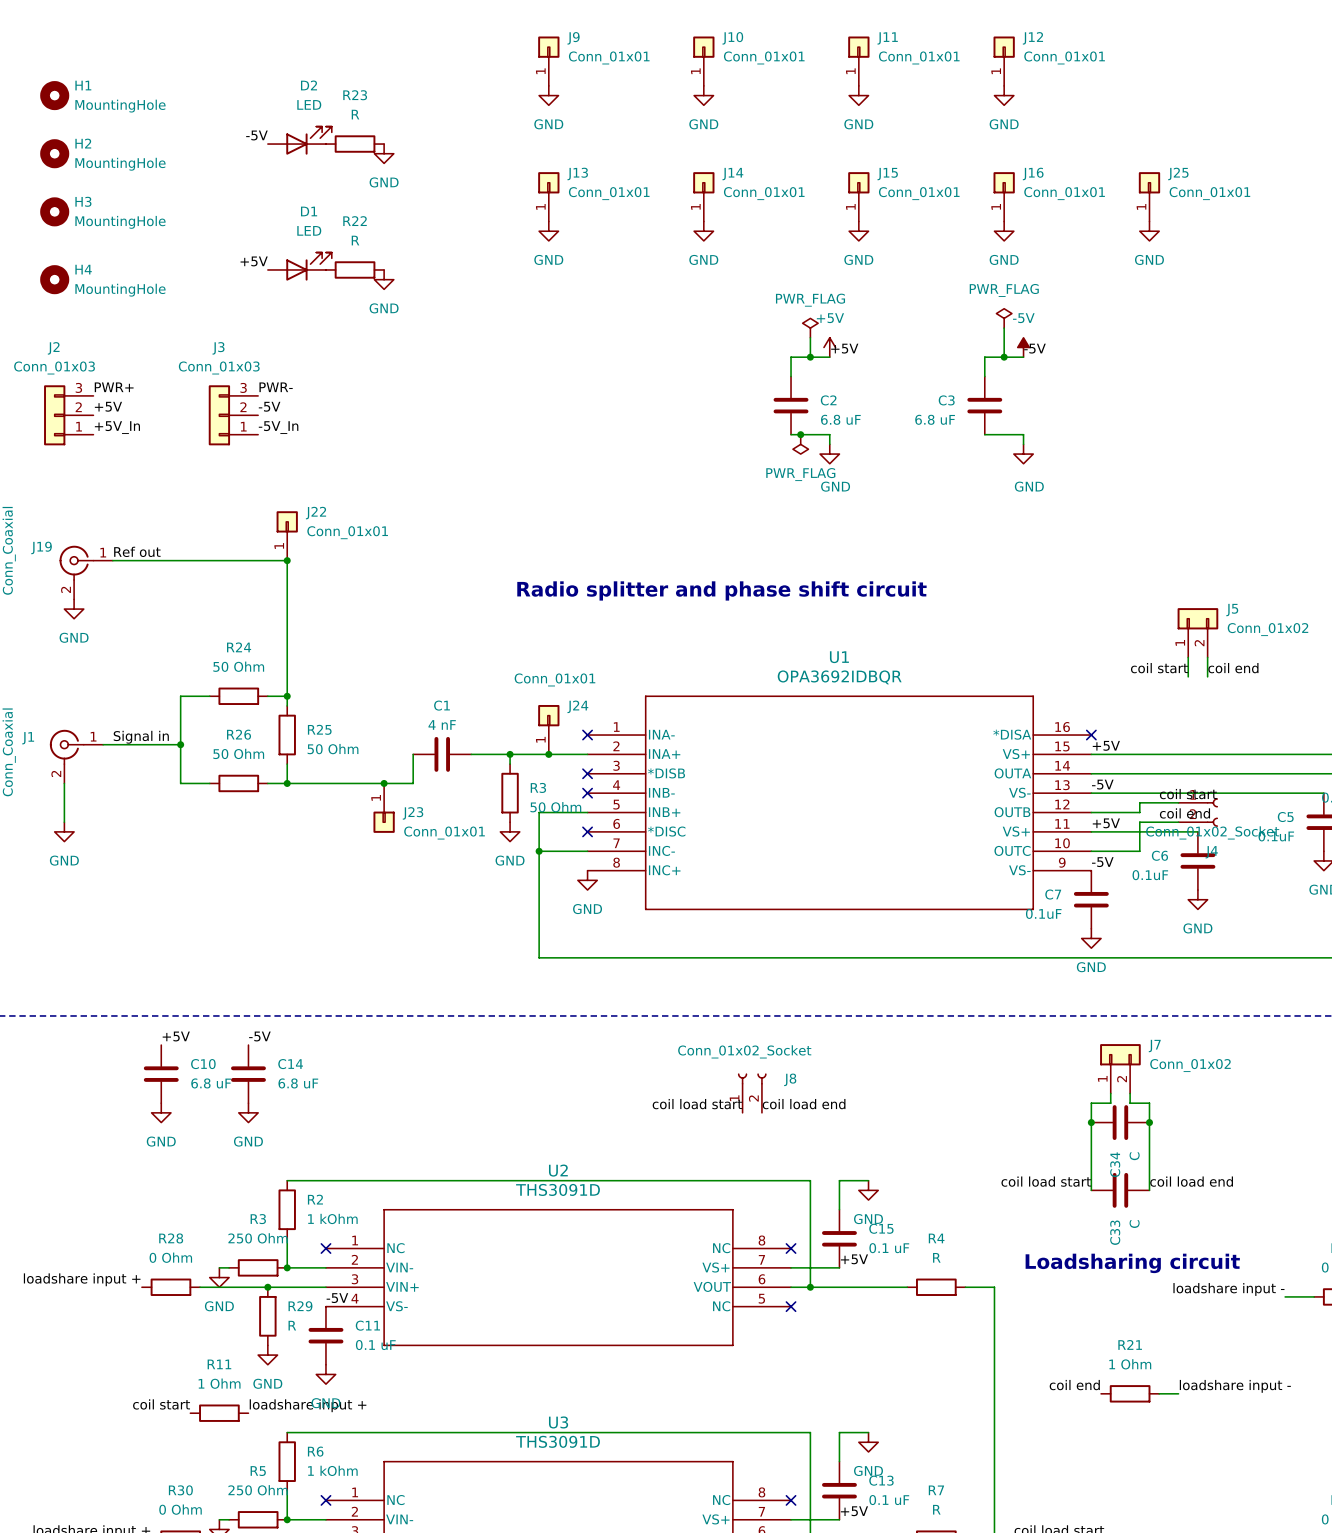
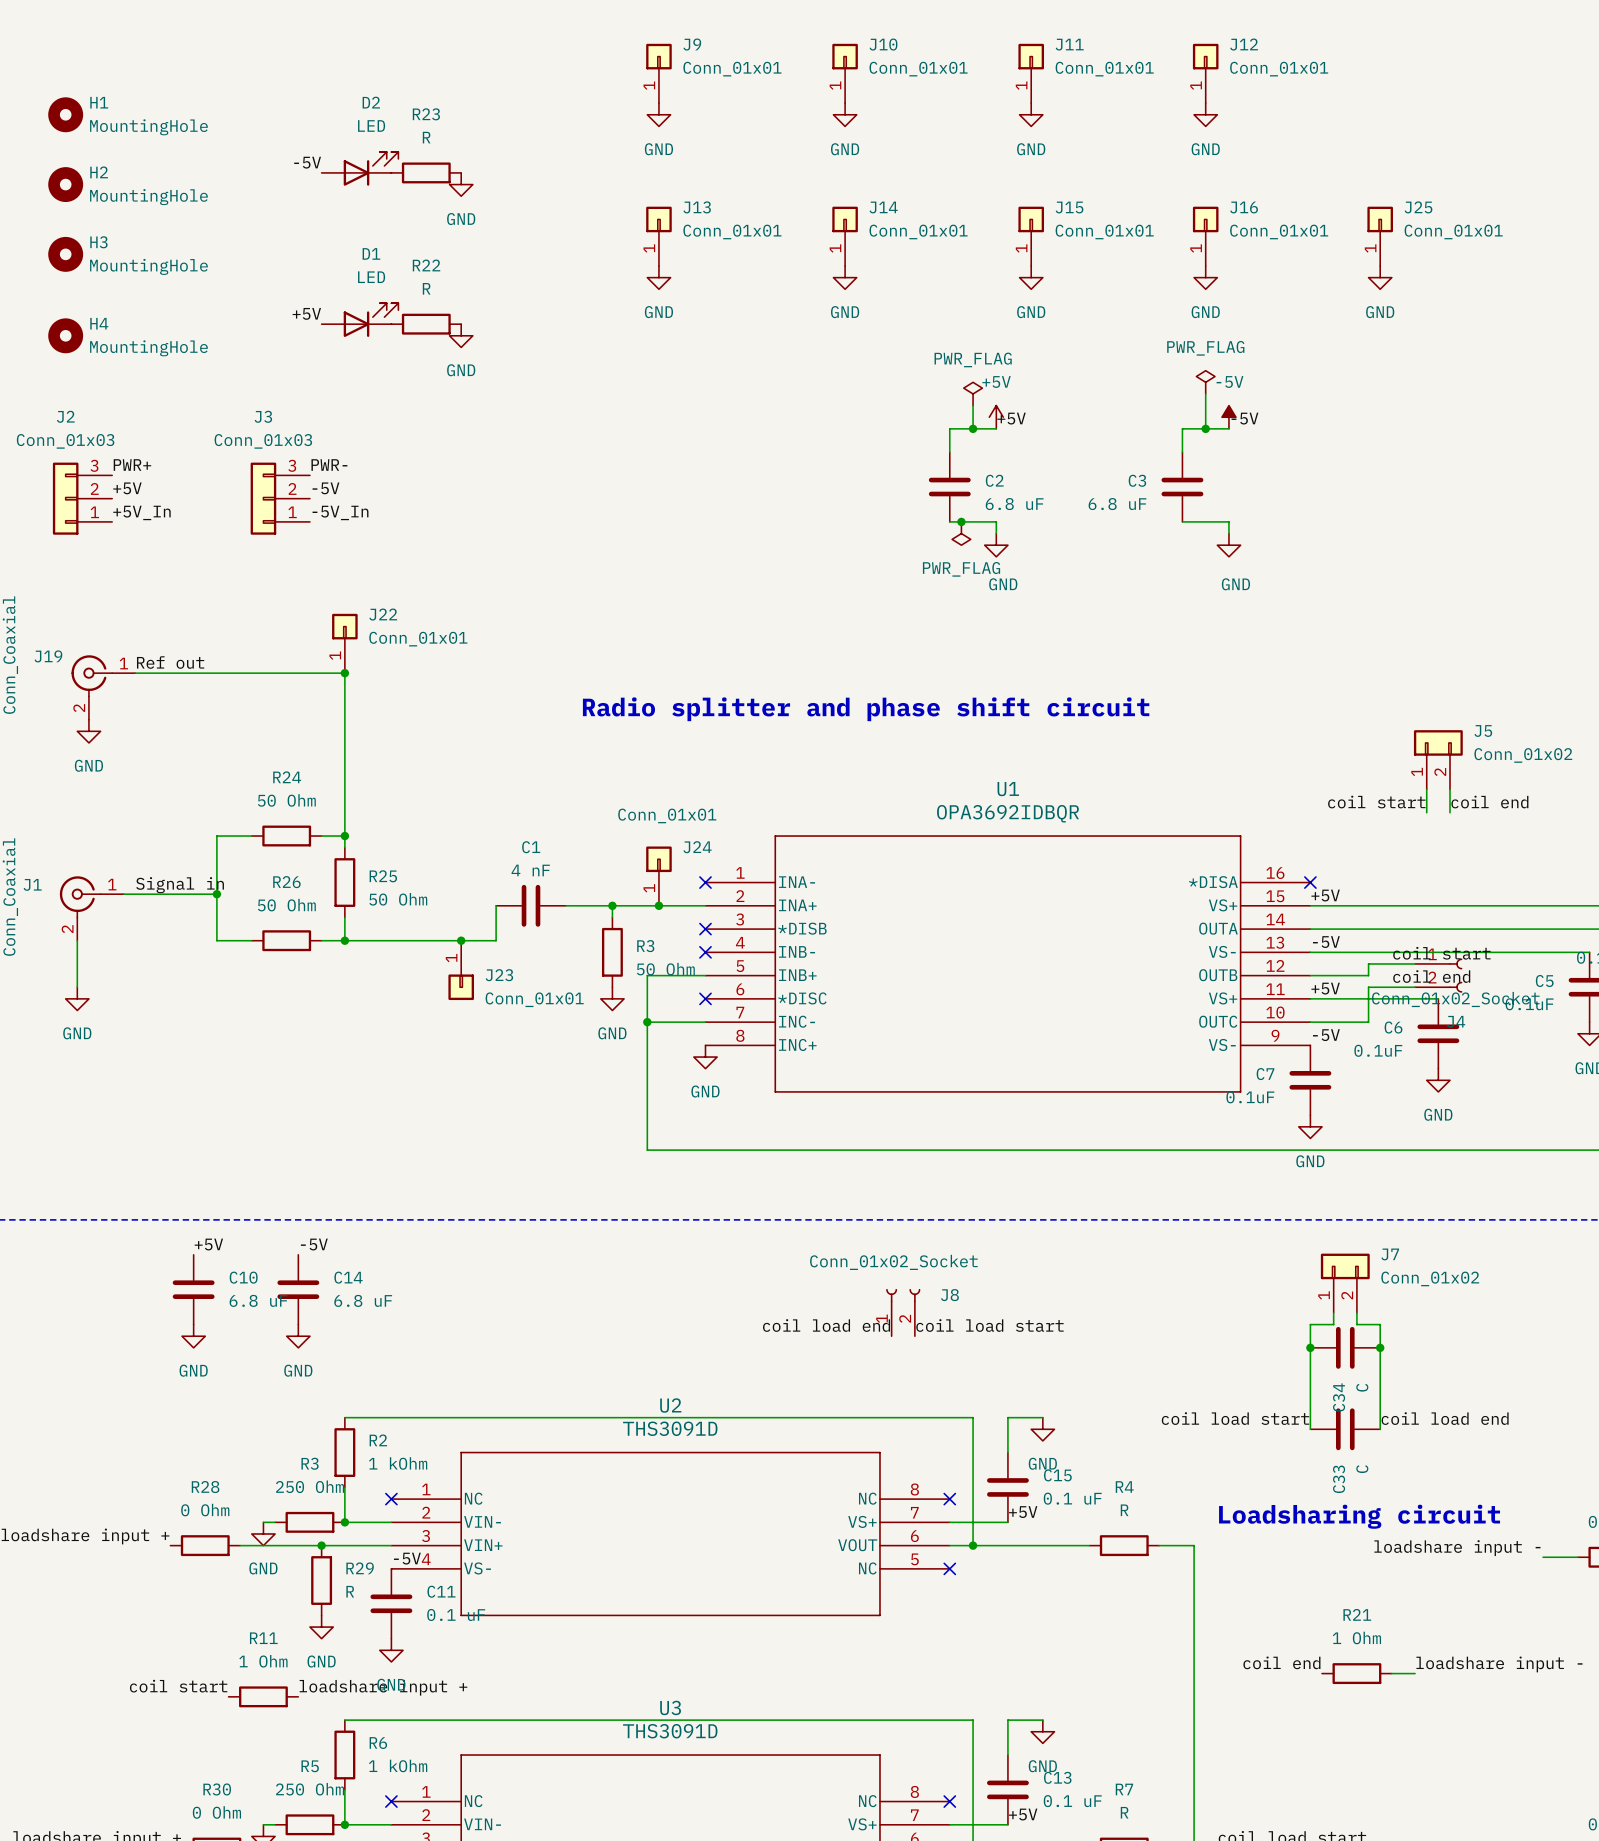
label: coil load start (697, 1104) -> coil load end (826, 1325)
label: coil load end (804, 1104) -> coil load start (989, 1325)

